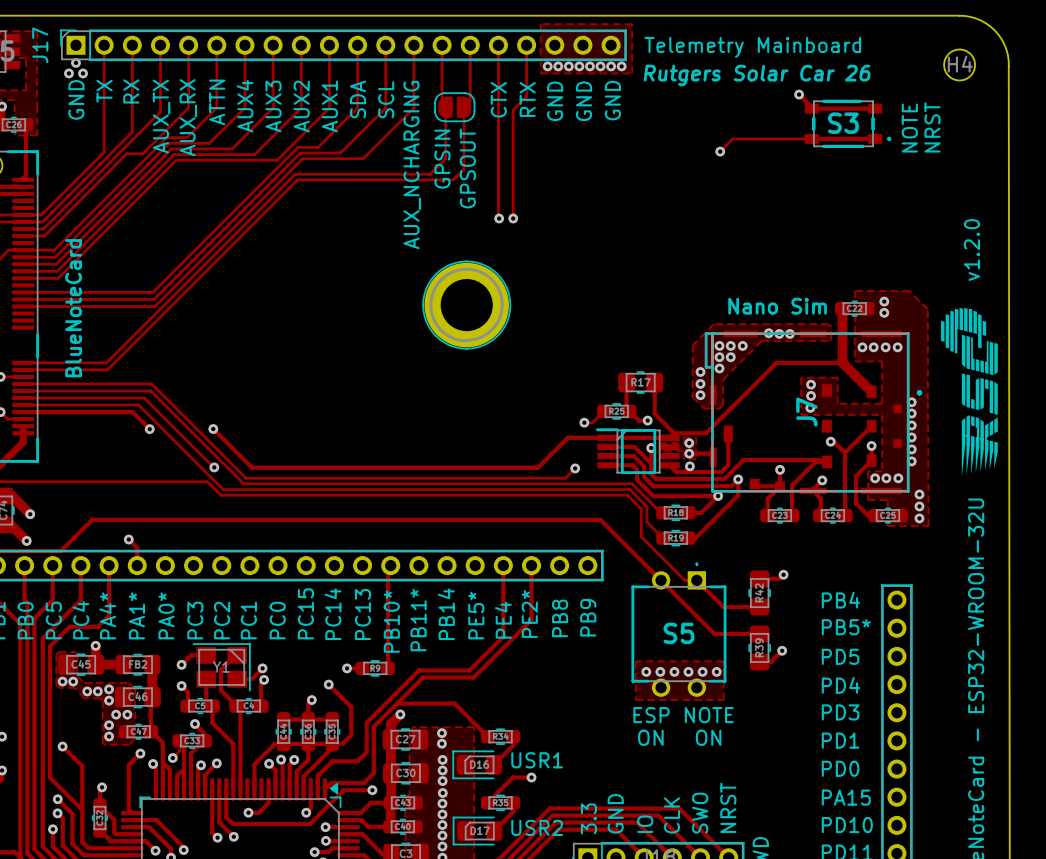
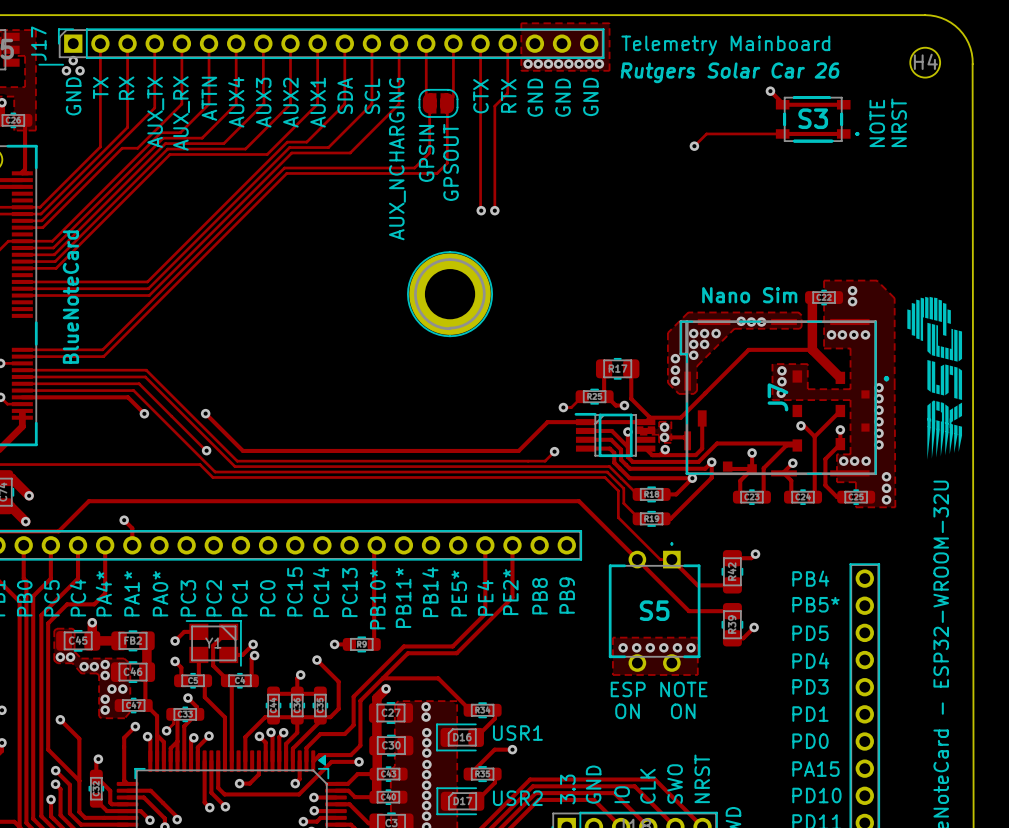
line: none -> (39, 64) (63, 64)
text: v1.2.0 (971, 250) -> none

